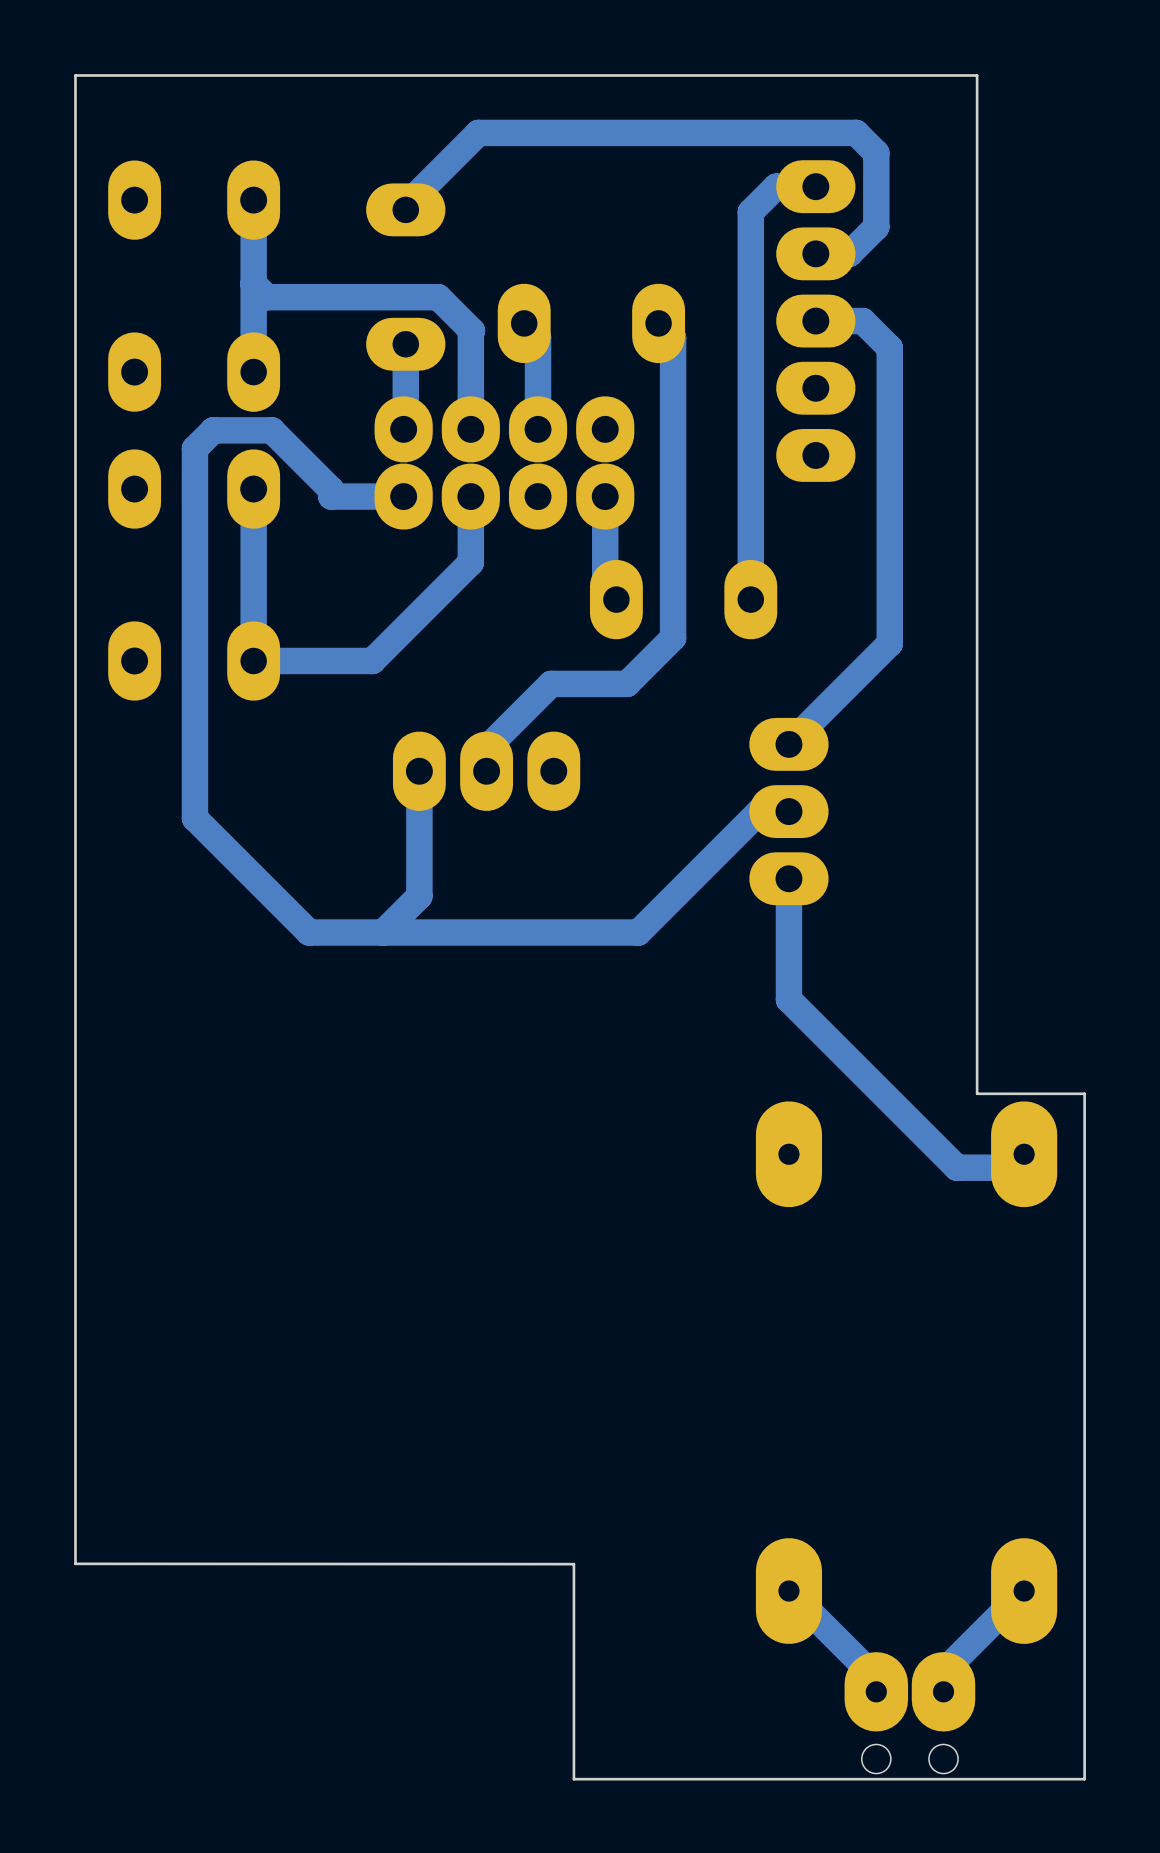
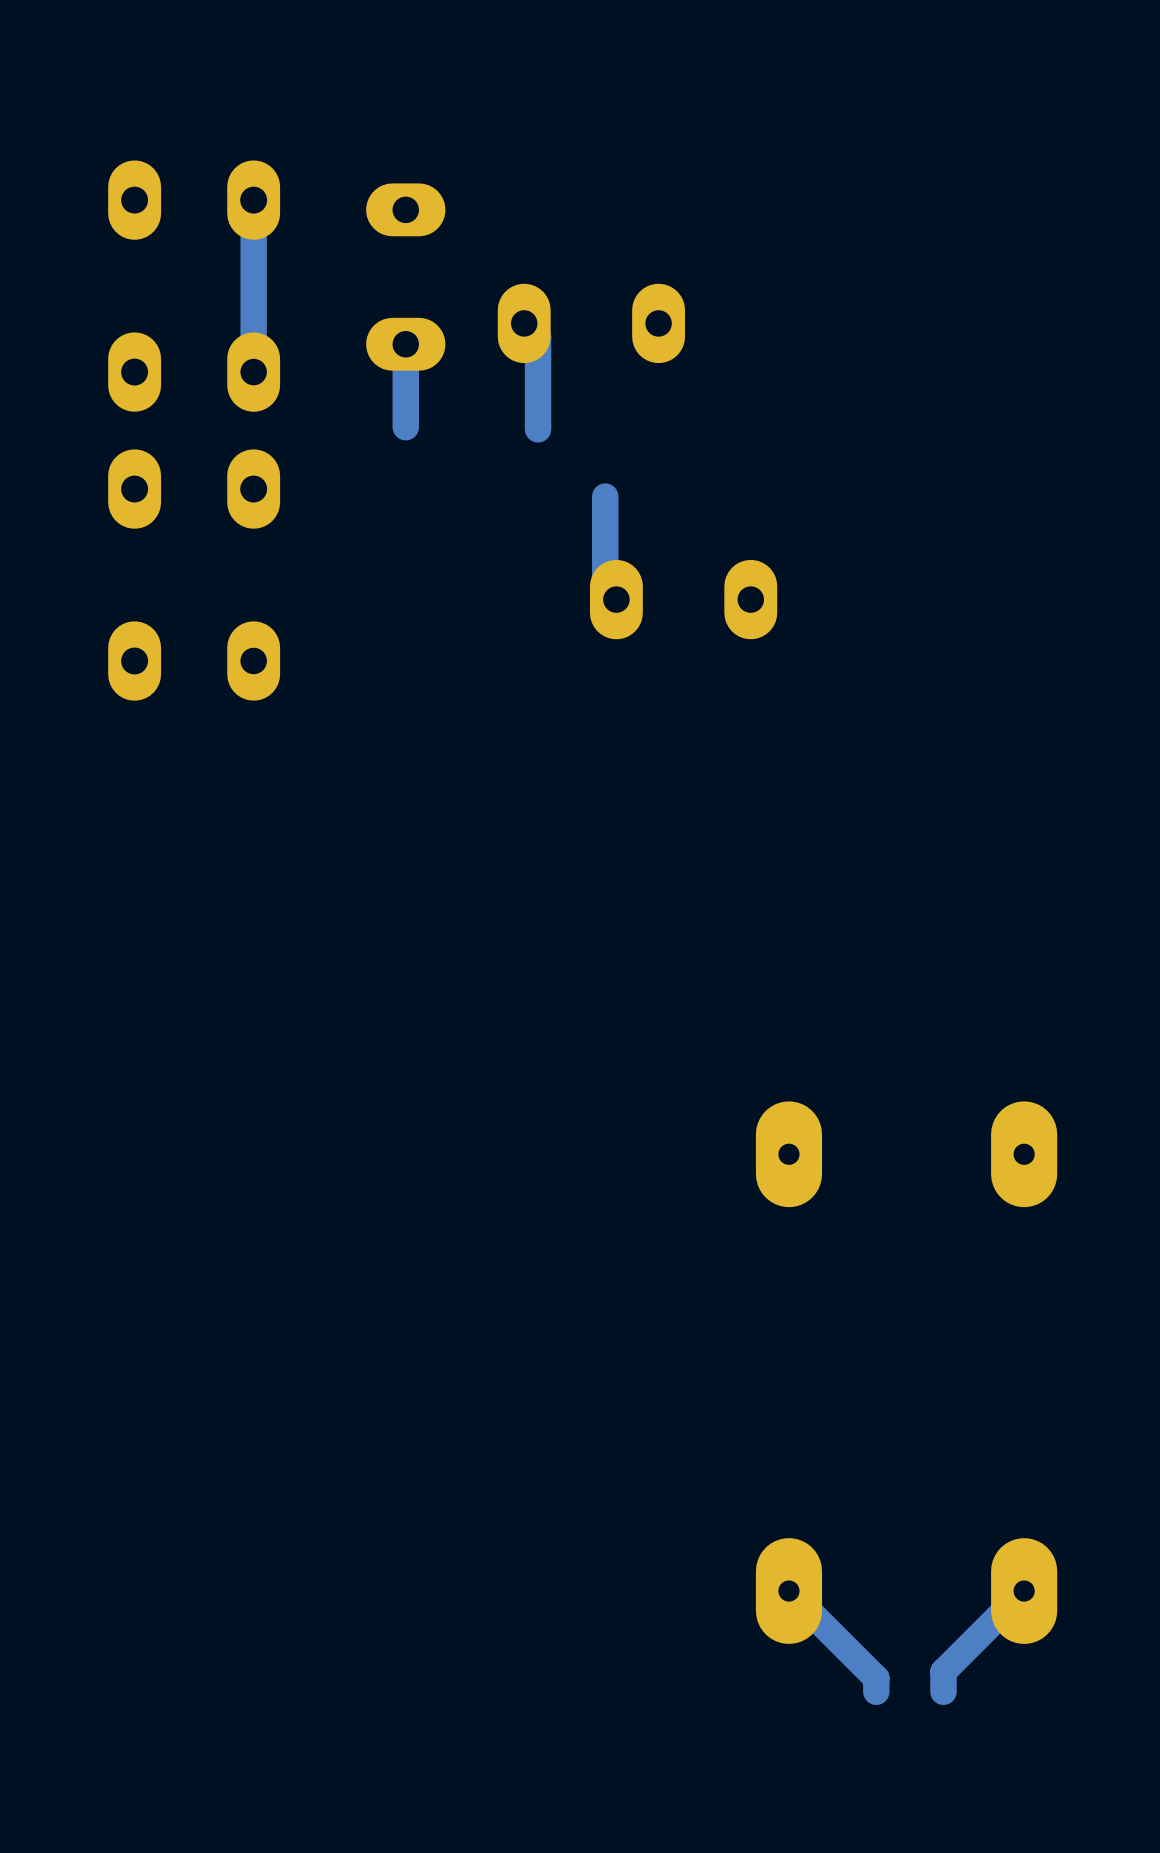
board edge: (977, 75) (977, 1093) (1084, 1093) (1084, 1779) (573, 1779) (573, 1564) (75, 1563) (75, 75) (977, 75) -> none
track: (815, 186) (776, 186) (750, 212) (750, 599) (745, 594) -> none
track: (405, 205) (478, 132) (856, 132) (876, 153) (876, 226) (849, 253) (815, 253) -> none
track: (253, 283) (266, 297) (438, 297) (471, 330) (470, 429) -> none
track: (815, 321) (862, 321) (889, 347) (889, 643) (788, 744) -> none
part: (815, 321) -> none
track: (658, 323) (673, 337) (673, 637) (627, 683) (551, 683) (486, 748) (486, 771) -> none
part: (504, 462) -> none
track: (253, 489) (253, 661) (372, 661) (470, 562) (470, 496) -> none
track: (403, 496) (331, 496) (331, 489) (271, 430) (213, 430) (194, 448) (194, 818) (309, 932) (638, 932) (759, 811) (788, 811) -> none
track: (419, 771) (419, 896) (383, 932) -> none
part: (486, 771) -> none
part: (788, 811) -> none
track: (788, 878) (788, 999) (956, 1167) (1024, 1167) -> none
part: (909, 1712) -> none

